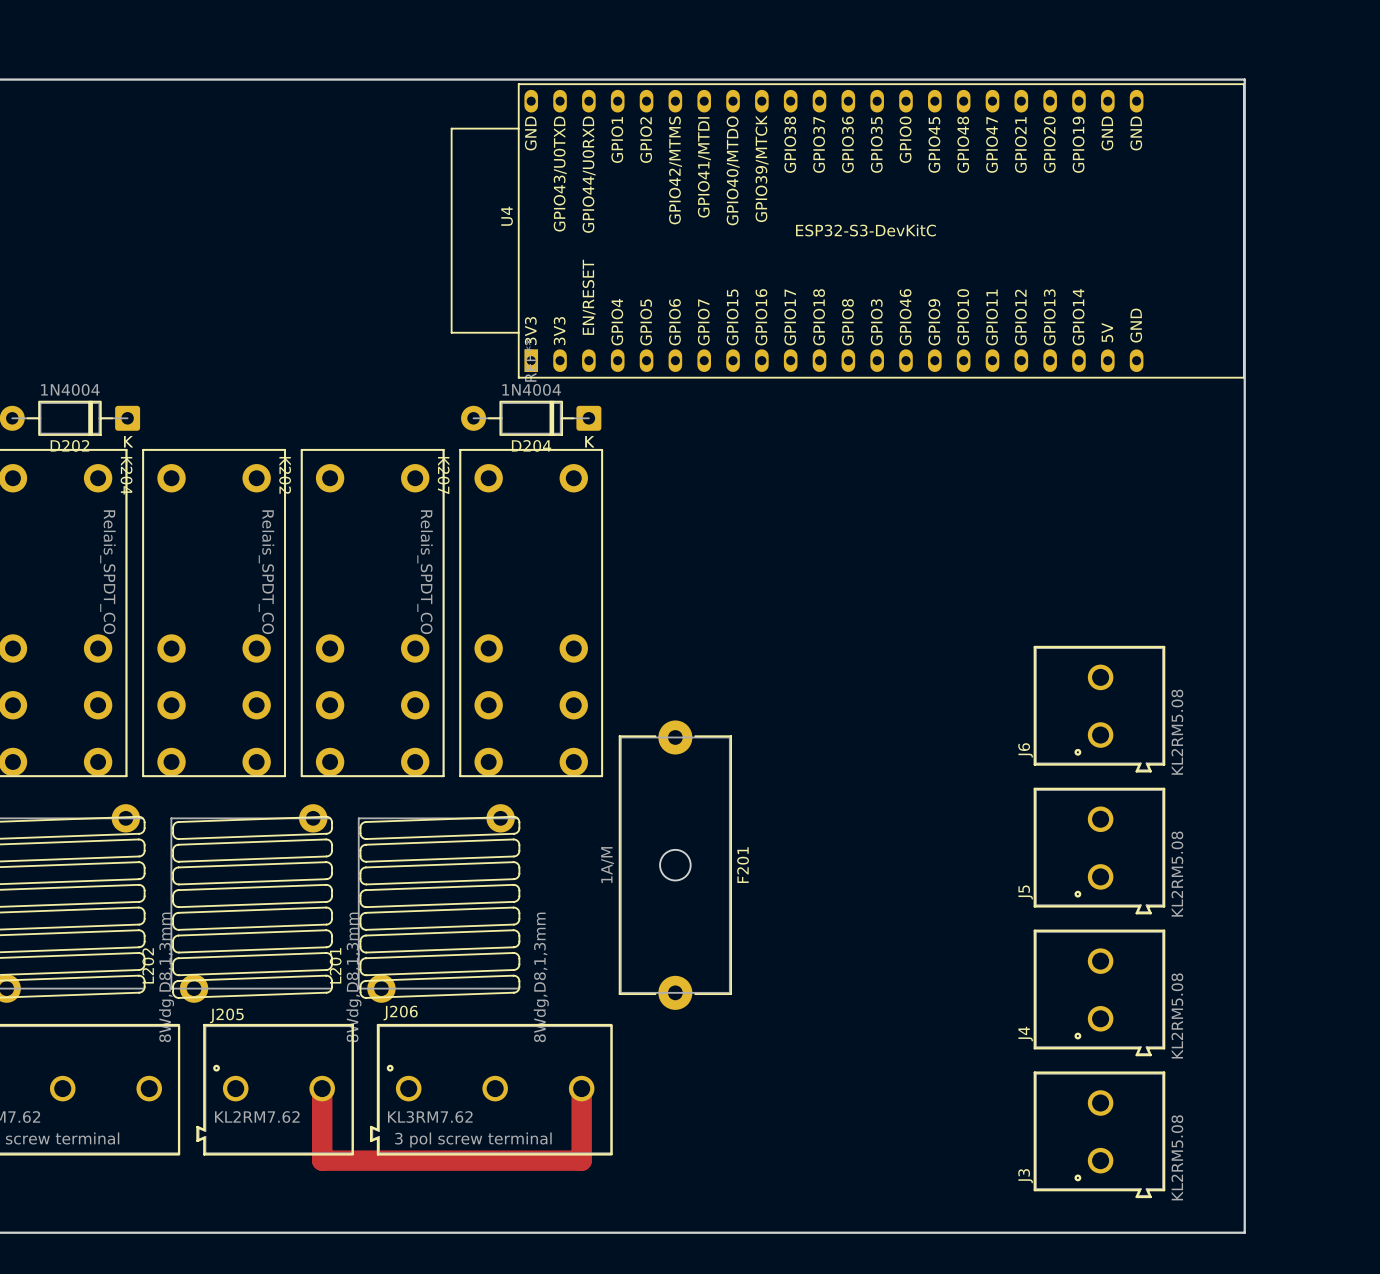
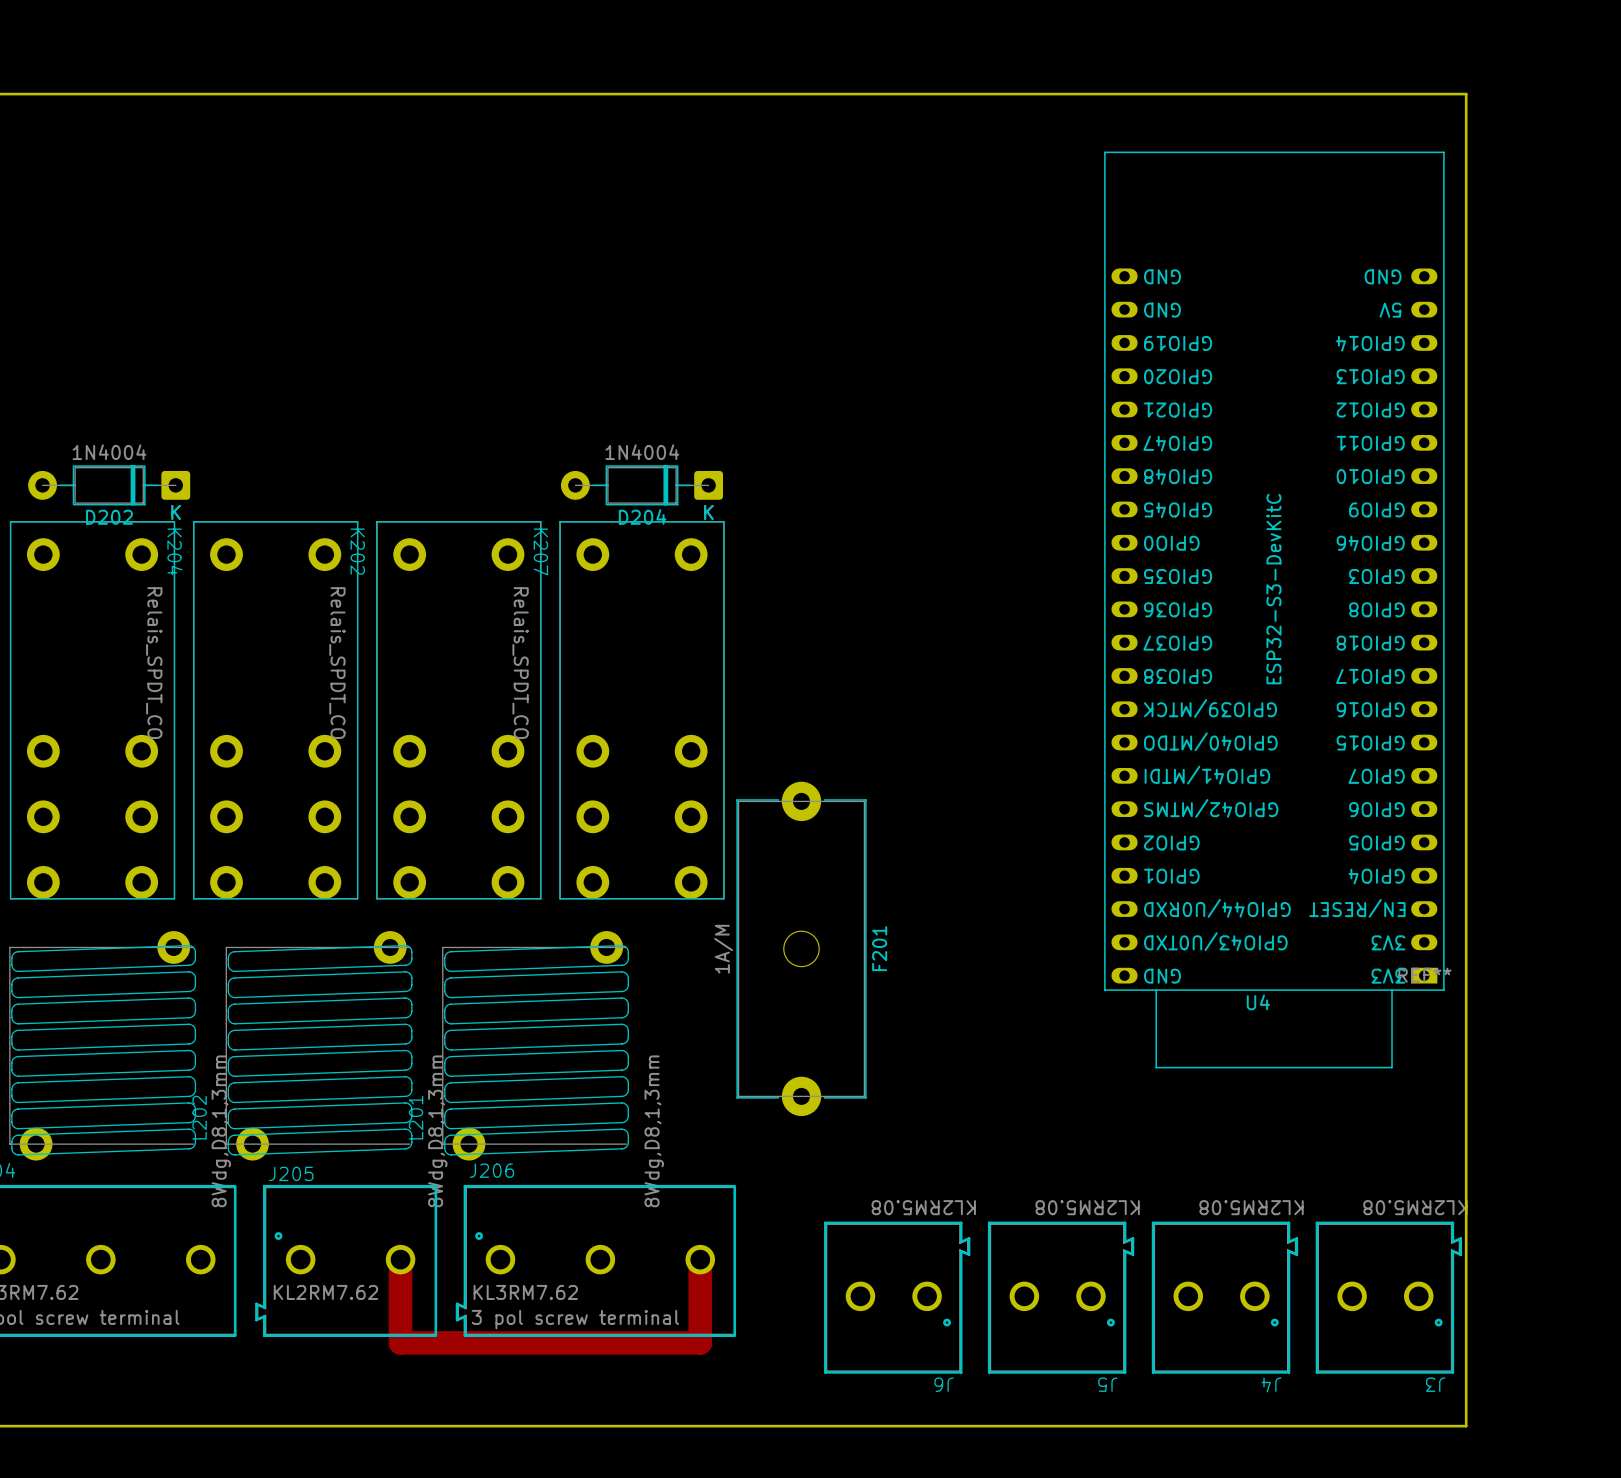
U4 rotation: 0° (847, 230) -> 90° counterclockwise (1274, 609)
J6 rotation: 0° (1099, 709) -> 90° counterclockwise (897, 1297)
J6 position: (1099, 709) -> (897, 1297)
J5 rotation: 0° (1099, 851) -> 90° counterclockwise (1061, 1297)
J5 position: (1099, 851) -> (1061, 1297)
F201 position: (675, 865) -> (801, 948)
J4 rotation: 0° (1099, 992) -> 90° counterclockwise (1224, 1297)
J4 position: (1099, 992) -> (1224, 1297)
J3 rotation: 0° (1099, 1134) -> 90° counterclockwise (1388, 1297)
J3 position: (1099, 1134) -> (1388, 1297)

